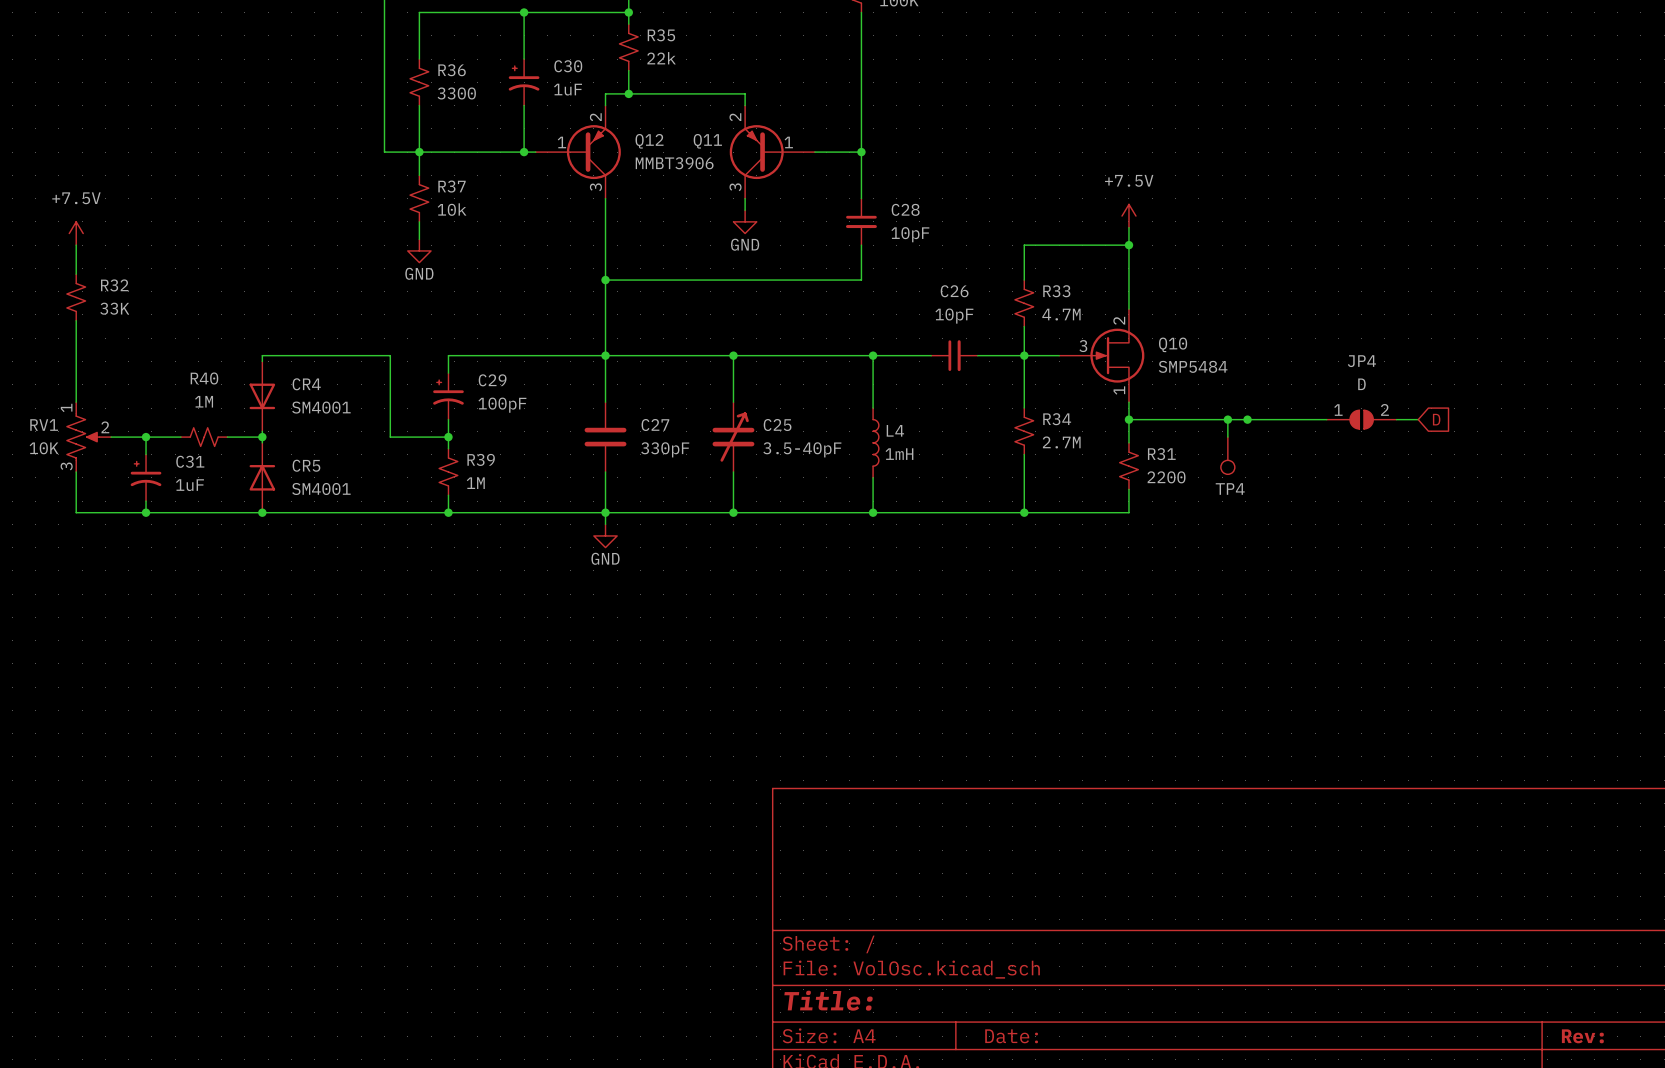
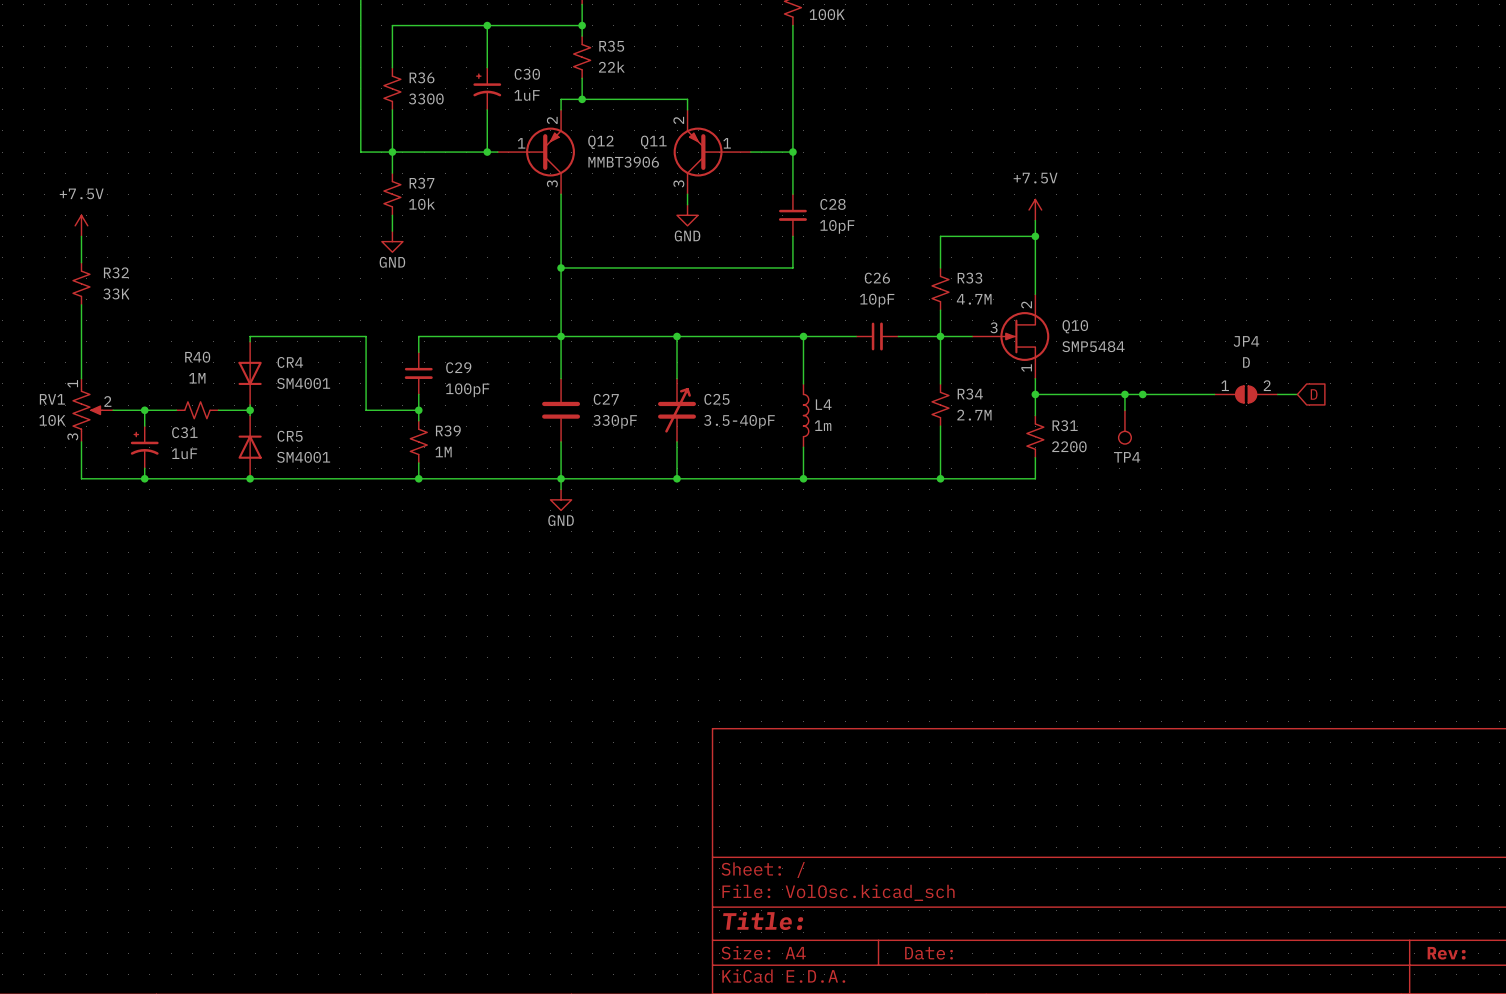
C29 symbol: [433, 373, 464, 420] -> [404, 352, 433, 395]
L4 value: 1mH (899, 454) -> 1m (823, 425)

